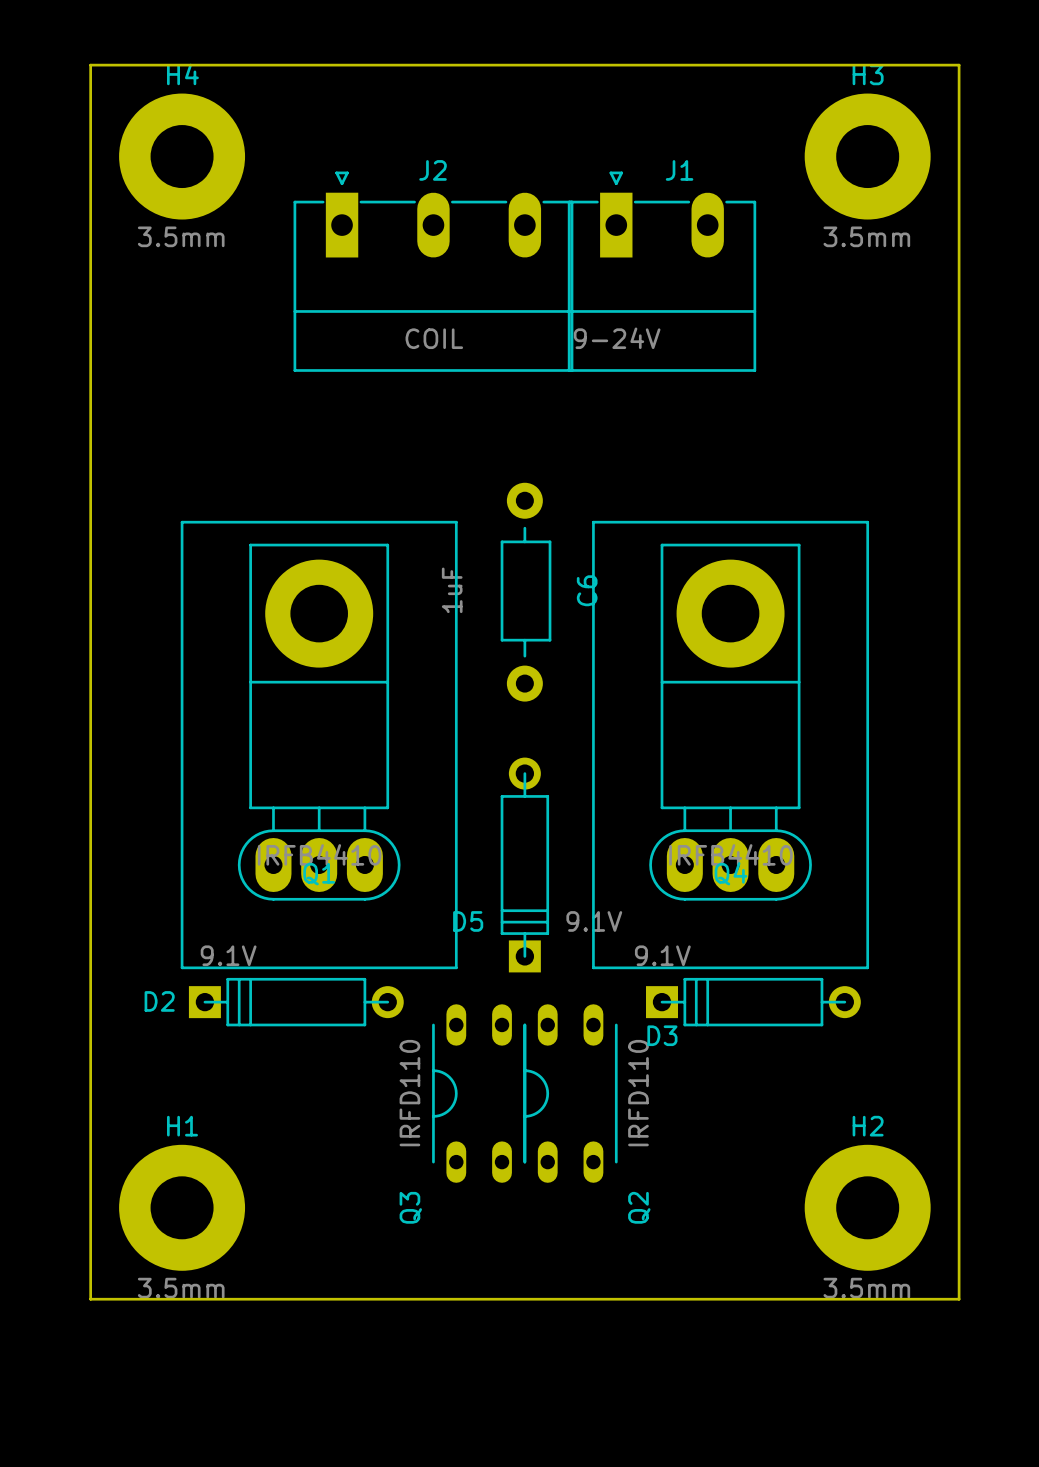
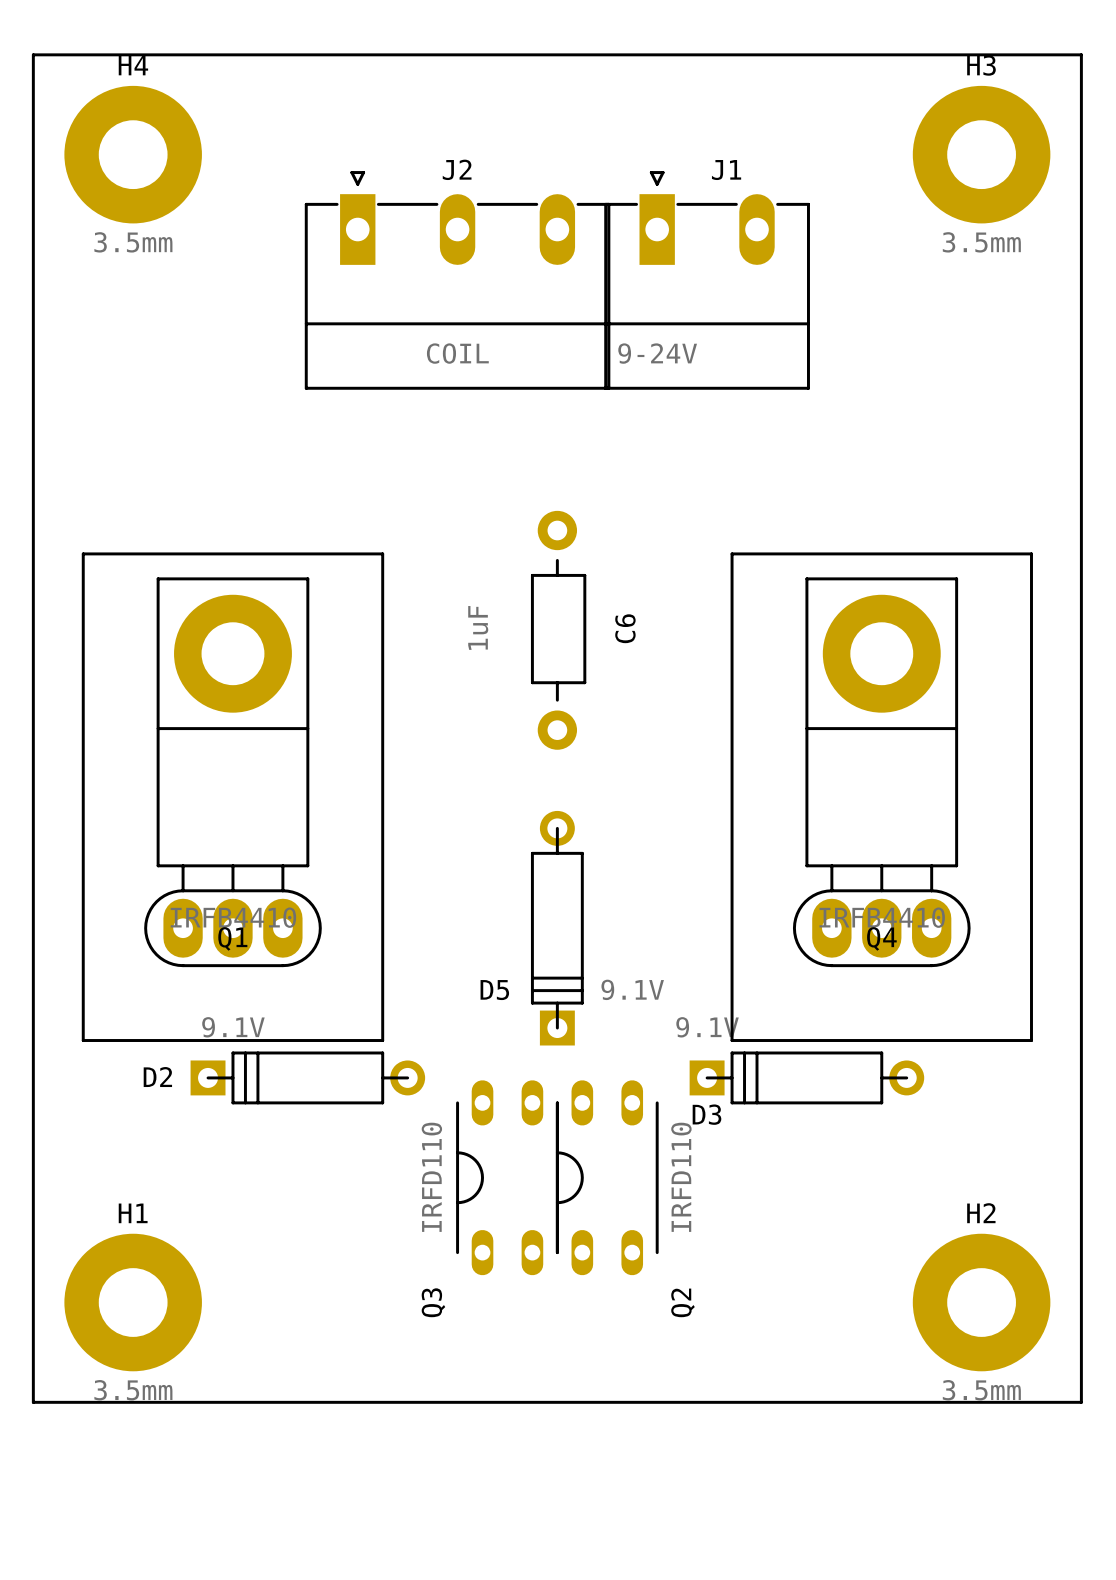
board edge: (90, 65) (90, 1299) -> (83, 54) (33, 54) (33, 1402) (83, 1402)
board edge: (959, 65) (959, 1299) -> (1031, 54) (1081, 54) (1081, 1402) (1031, 1402)
H4 position: (182, 156) -> (133, 154)
H3 position: (867, 156) -> (981, 154)
Q1 position: (319, 745) -> (232, 797)
Q4 position: (730, 745) -> (881, 797)
H1 position: (182, 1207) -> (133, 1302)
H2 position: (867, 1207) -> (981, 1302)

